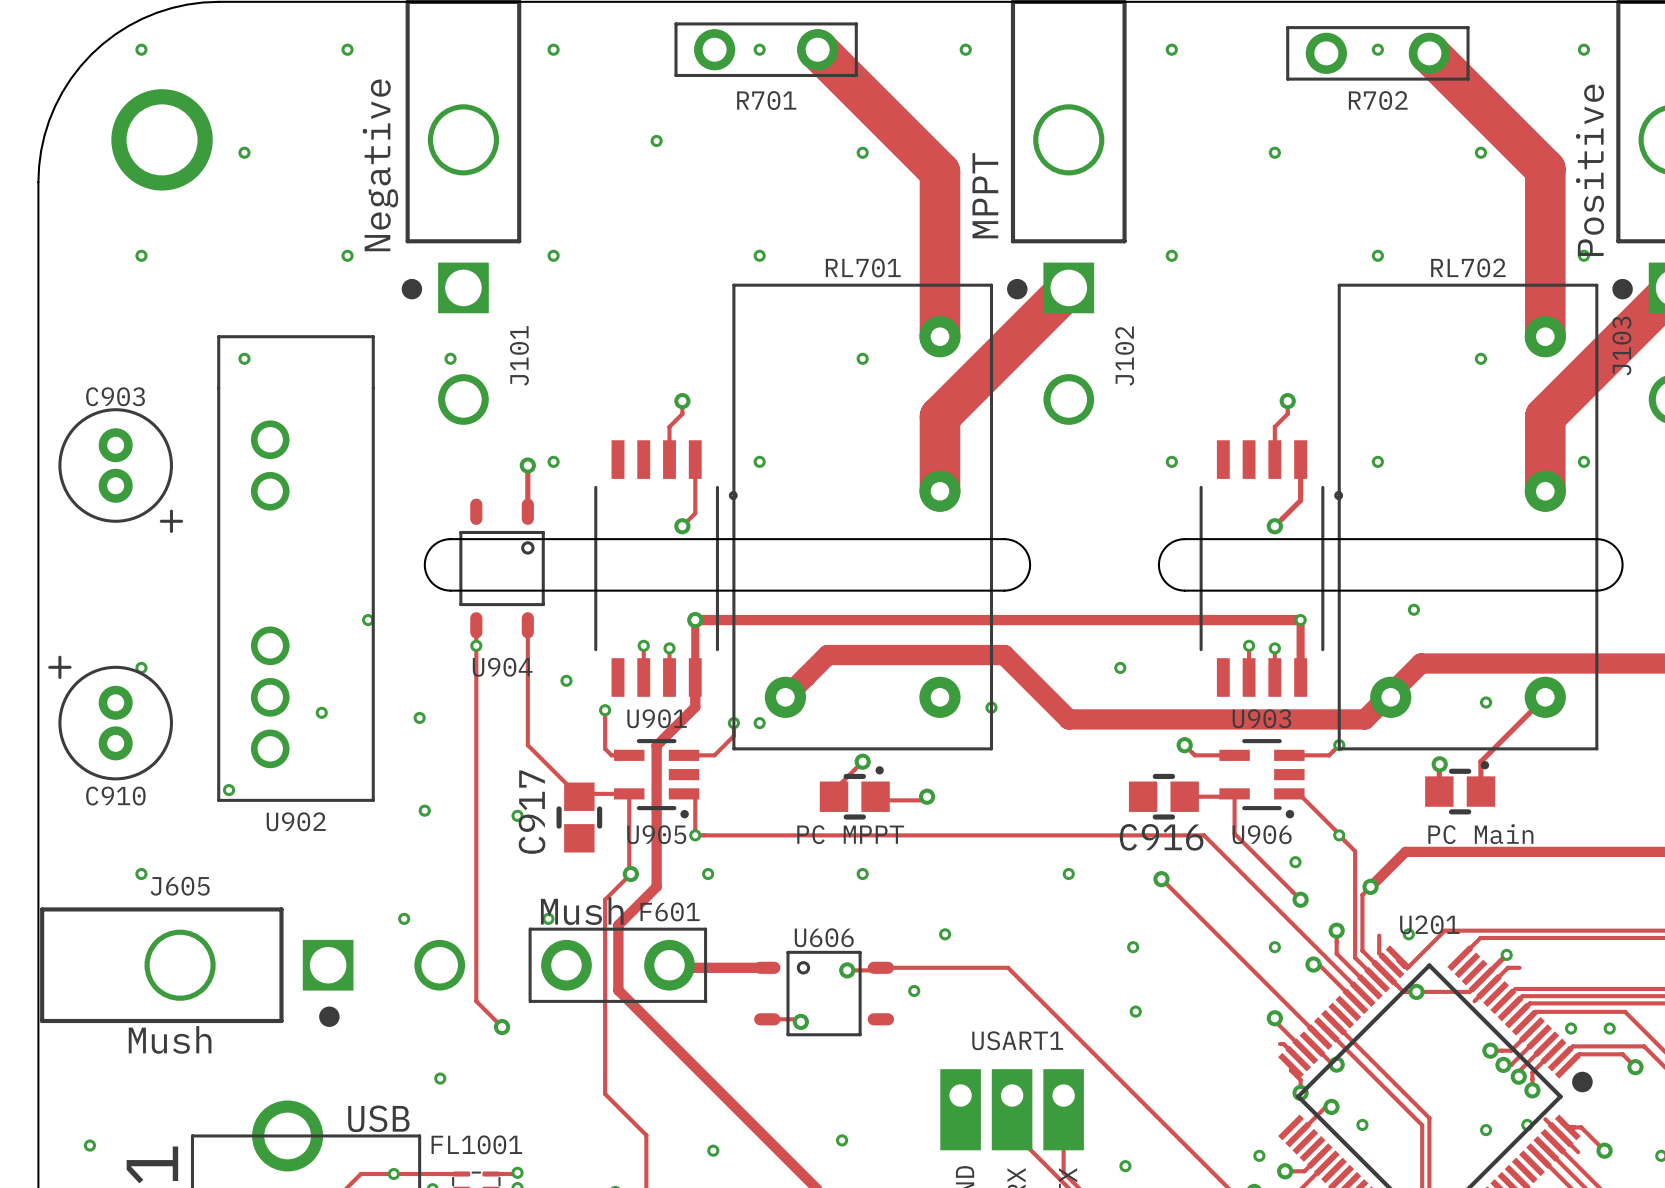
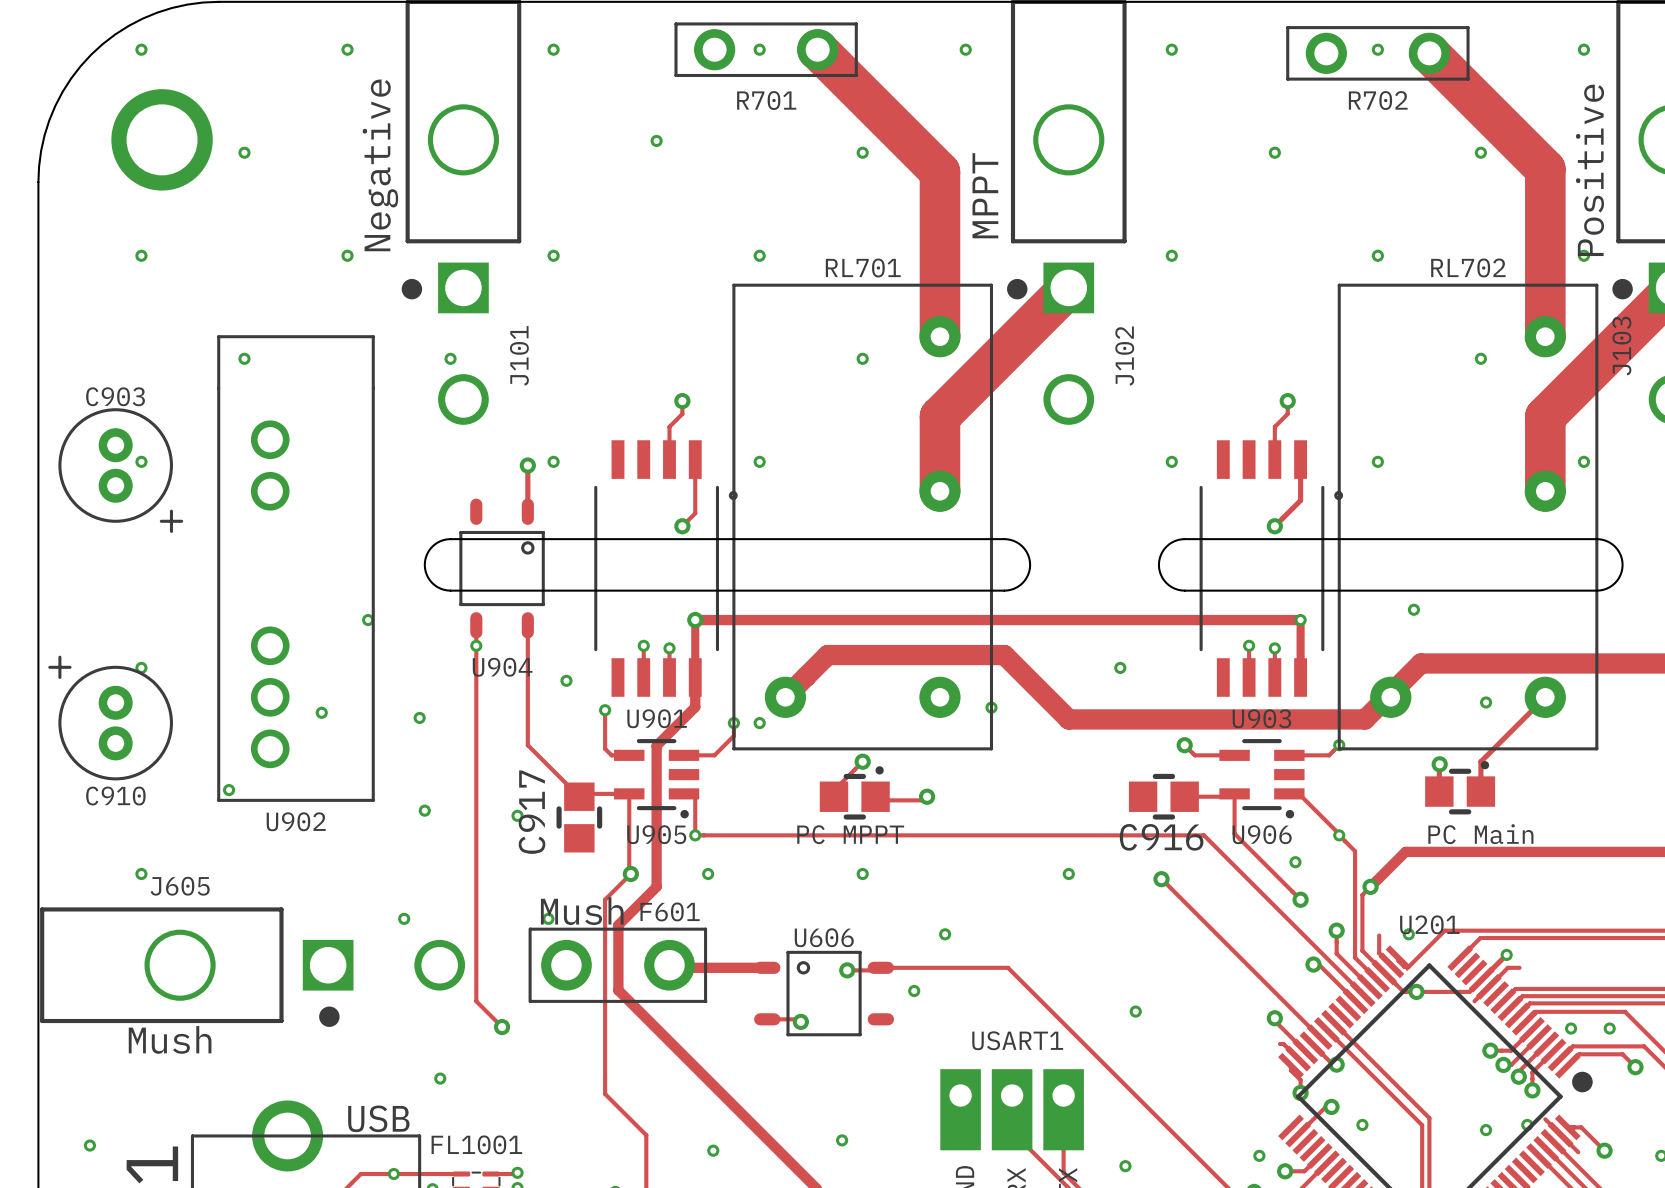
via: none -> (141, 461)
via: (1133, 947) -> none
via: (1274, 947) -> none

